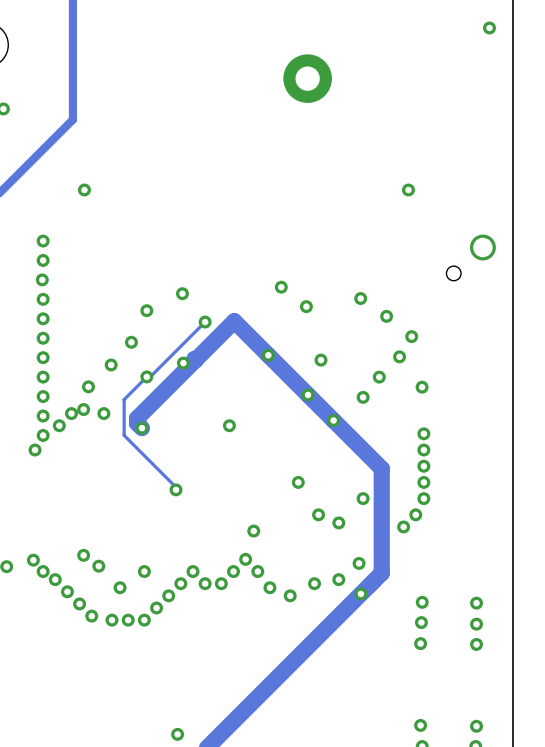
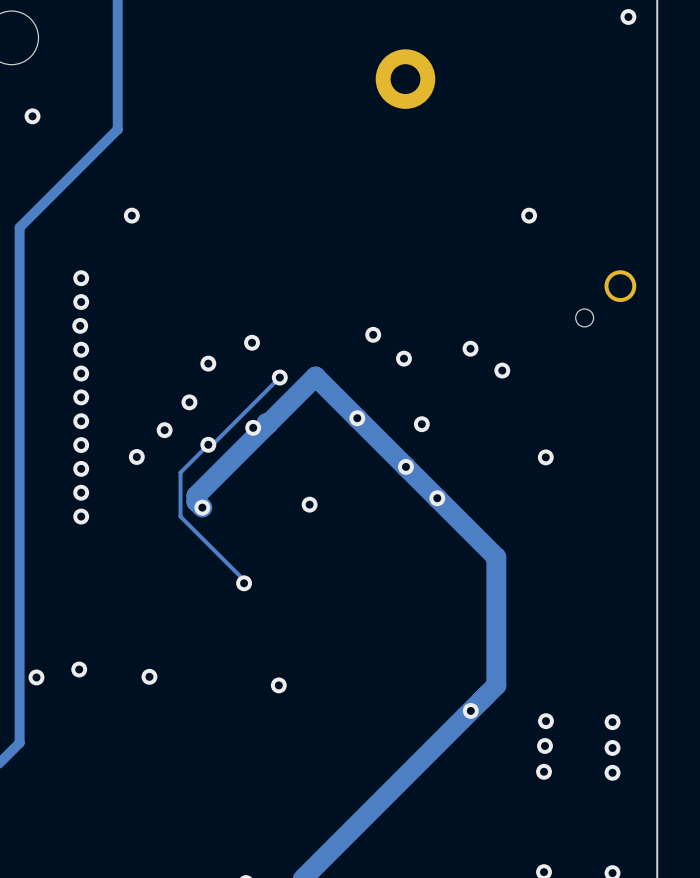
via: (411, 336) -> none
via: (399, 356) -> none
via: (379, 377) -> none
via: (363, 397) -> none
via: (83, 409) -> none
via: (71, 413) -> none
via: (103, 413) -> none
via: (59, 425) -> none
via: (423, 433) -> none
via: (35, 450) -> none
via: (423, 450) -> none
via: (423, 466) -> none
via: (298, 482) -> none
via: (423, 482) -> none
via: (363, 498) -> none
via: (423, 498) -> none
via: (318, 514) -> none
via: (415, 514) -> none
via: (338, 522) -> none
via: (403, 526) -> none
via: (253, 531) -> none
via: (83, 555) -> none
via: (245, 559) -> none
via: (33, 560) -> none
via: none -> (79, 669)
via: (359, 563) -> none
via: (43, 571) -> none
via: (144, 571) -> none
via: (193, 571) -> none
via: (233, 571) -> none
via: (257, 571) -> none
via: none -> (278, 685)
via: (55, 579) -> none
via: (338, 579) -> none
via: (180, 583) -> none
via: (205, 583) -> none
via: (221, 583) -> none
via: (314, 583) -> none
via: (120, 587) -> none
via: (269, 587) -> none
via: (67, 591) -> none
via: (168, 595) -> none
via: (290, 595) -> none
via: (79, 603) -> none
via: (156, 607) -> none
via: (91, 616) -> none
via: (111, 620) -> none
via: (128, 620) -> none
via: (144, 620) -> none

